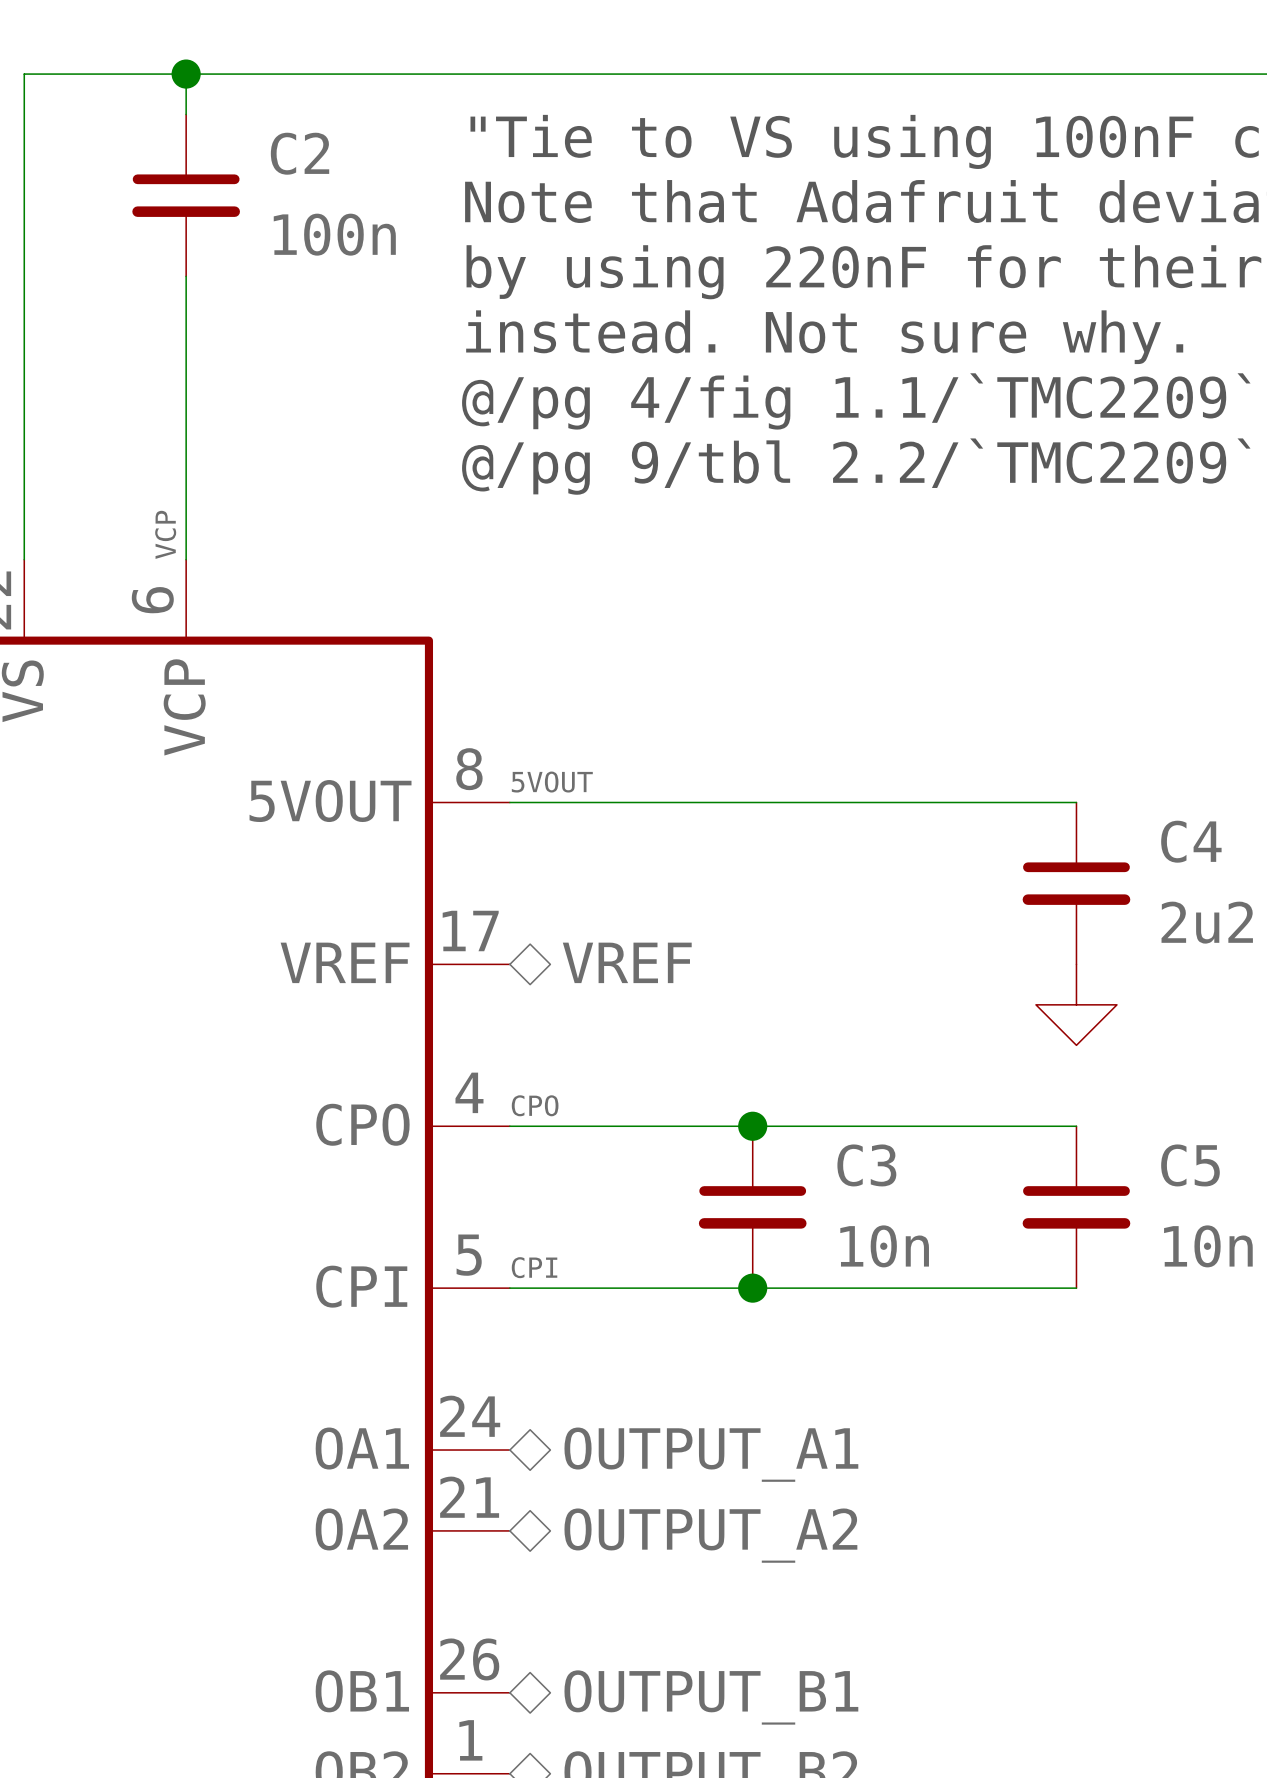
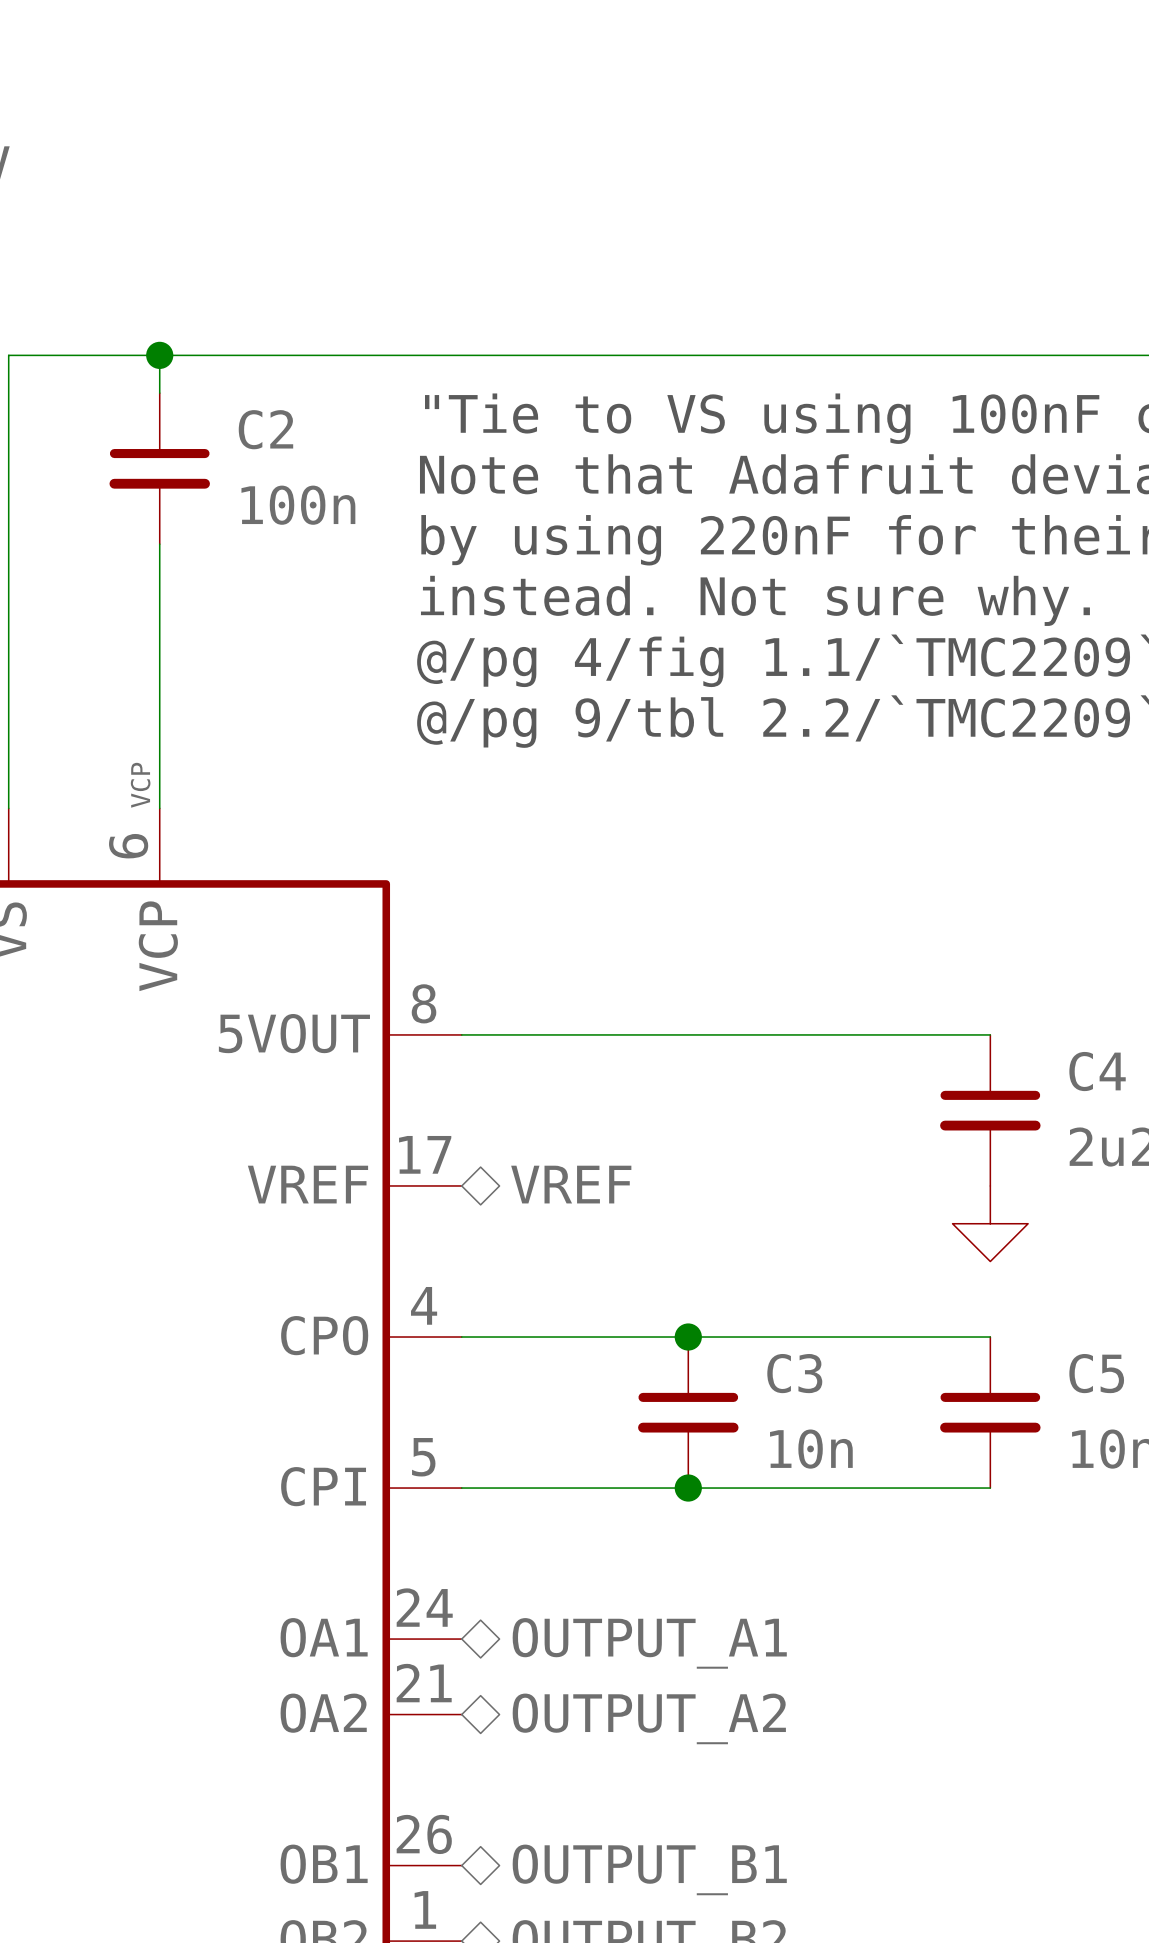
label: 5VOUT (552, 782) -> none
label: CPO (535, 1105) -> none
label: CPI (534, 1267) -> none

